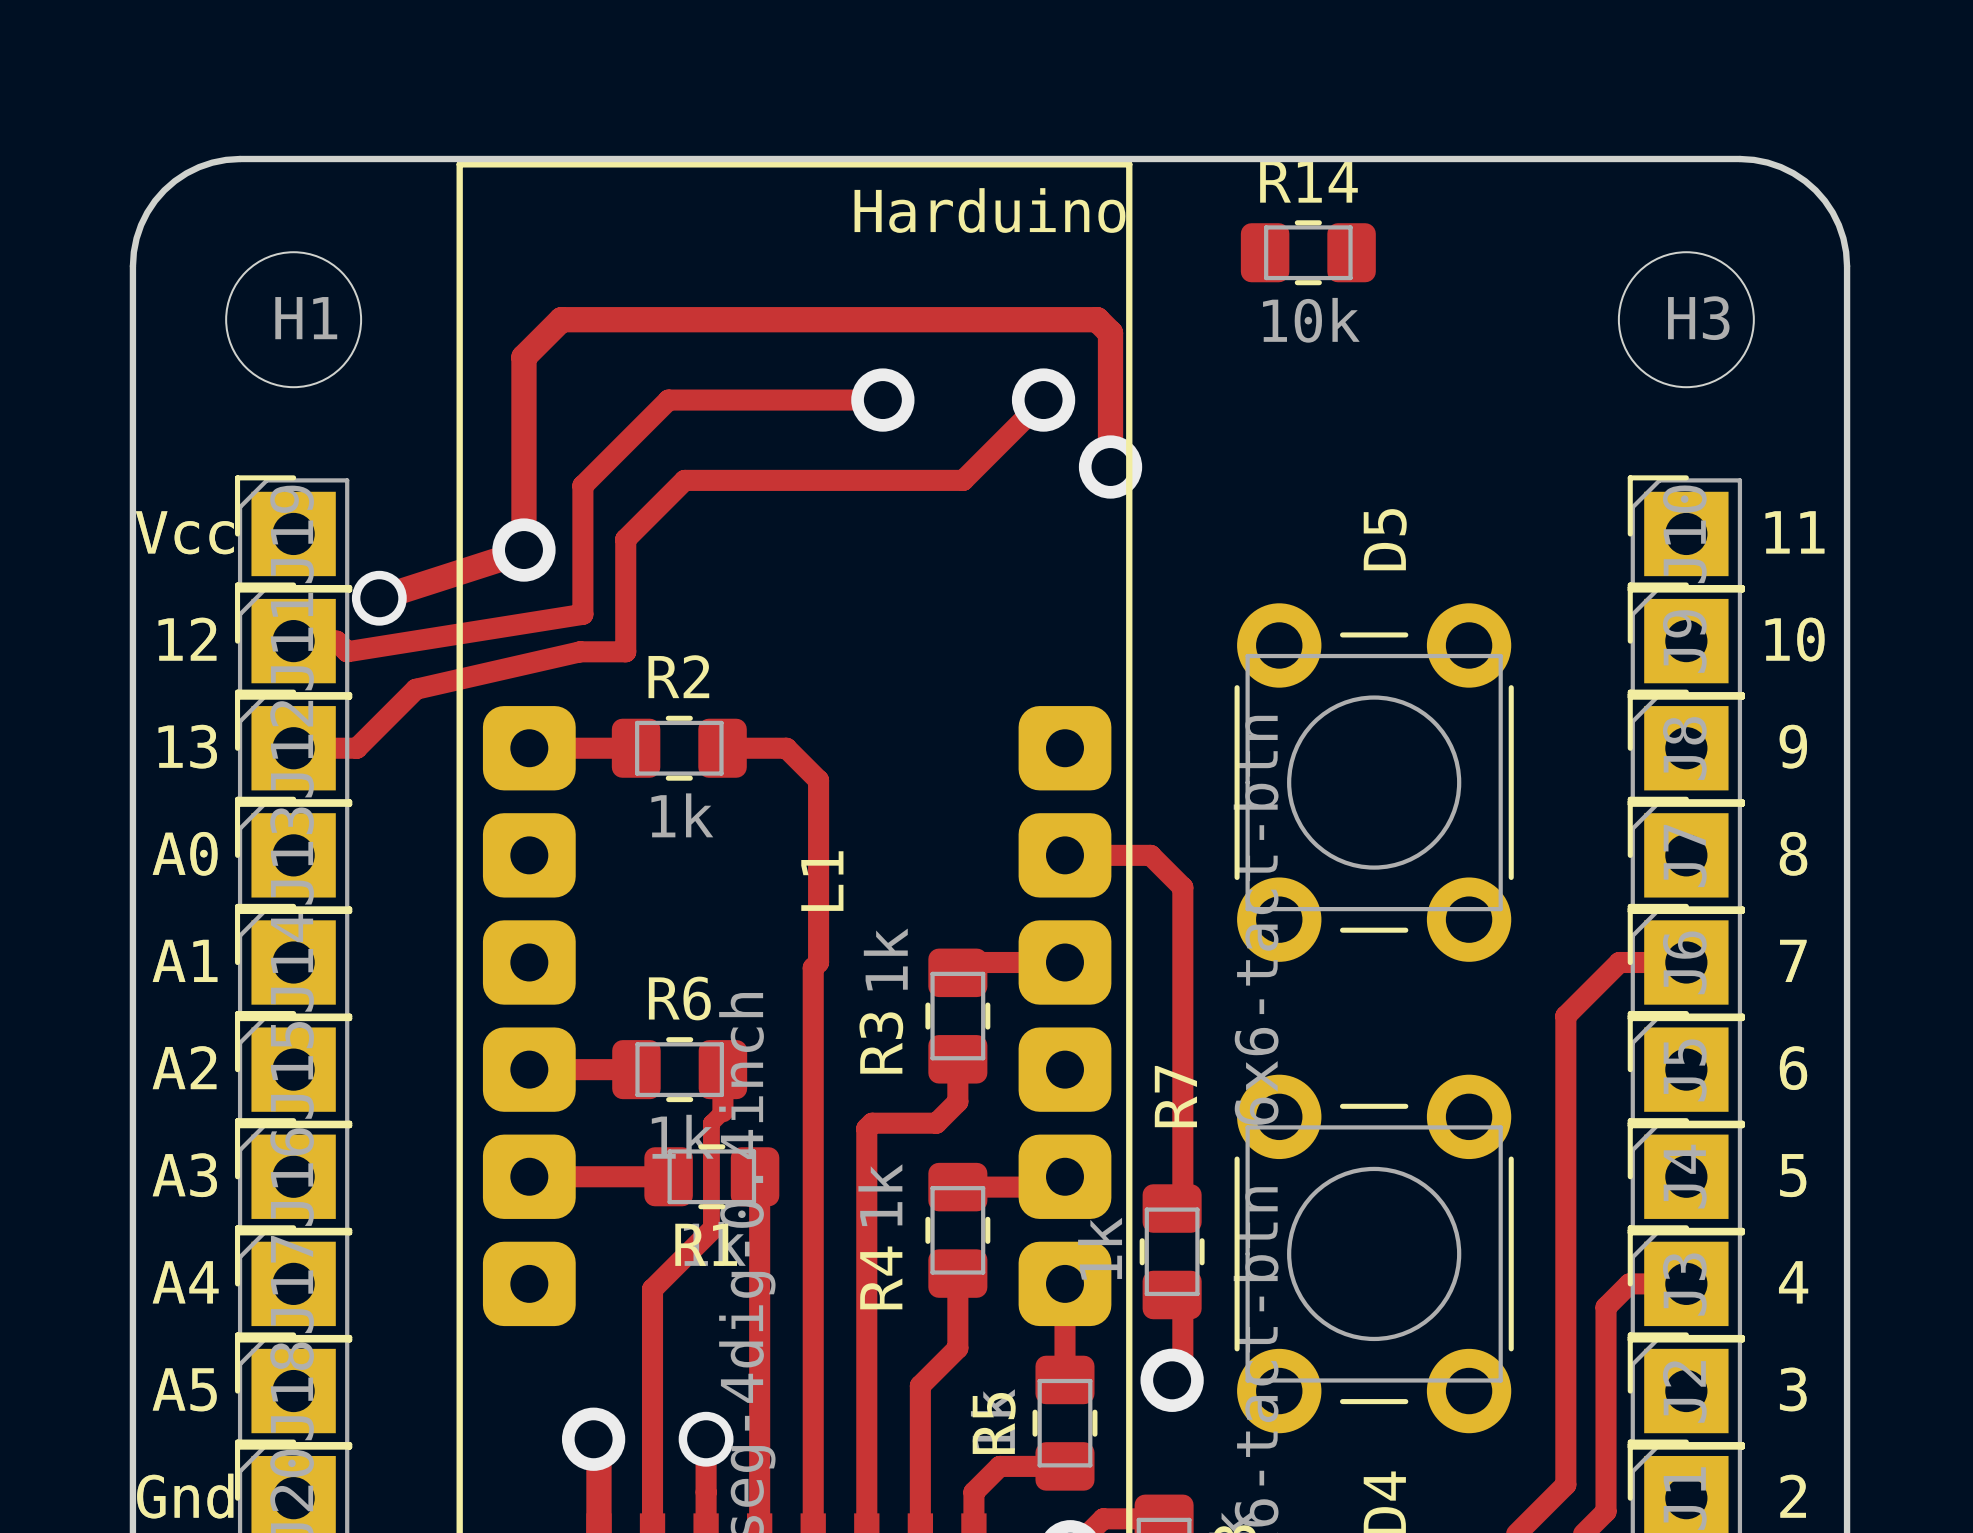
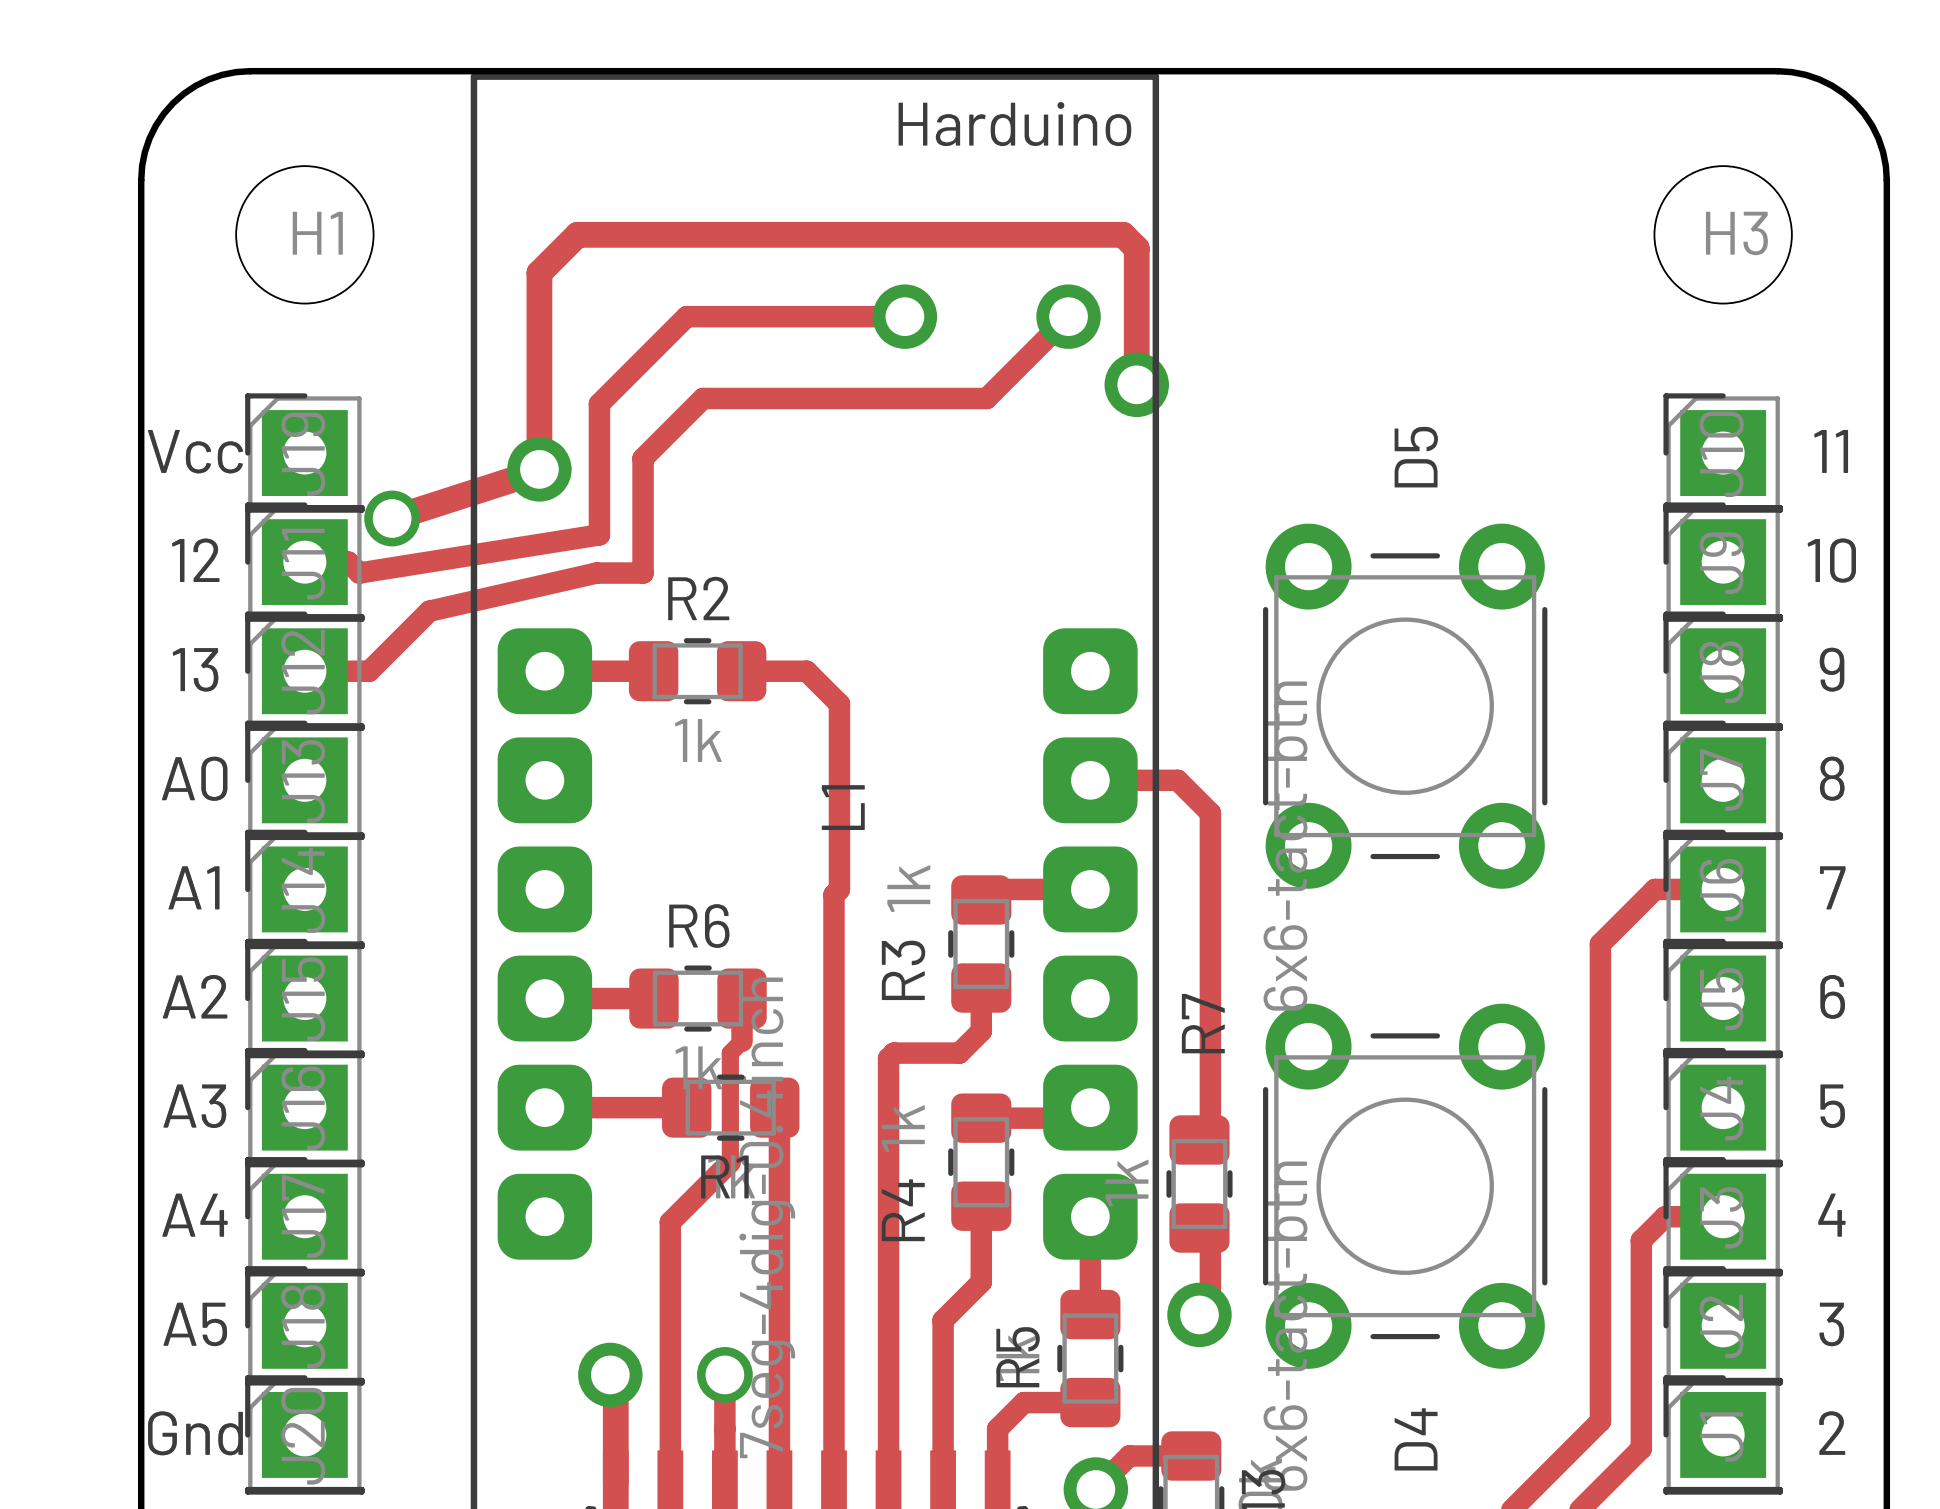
R14: 10k (1308, 252) -> none

